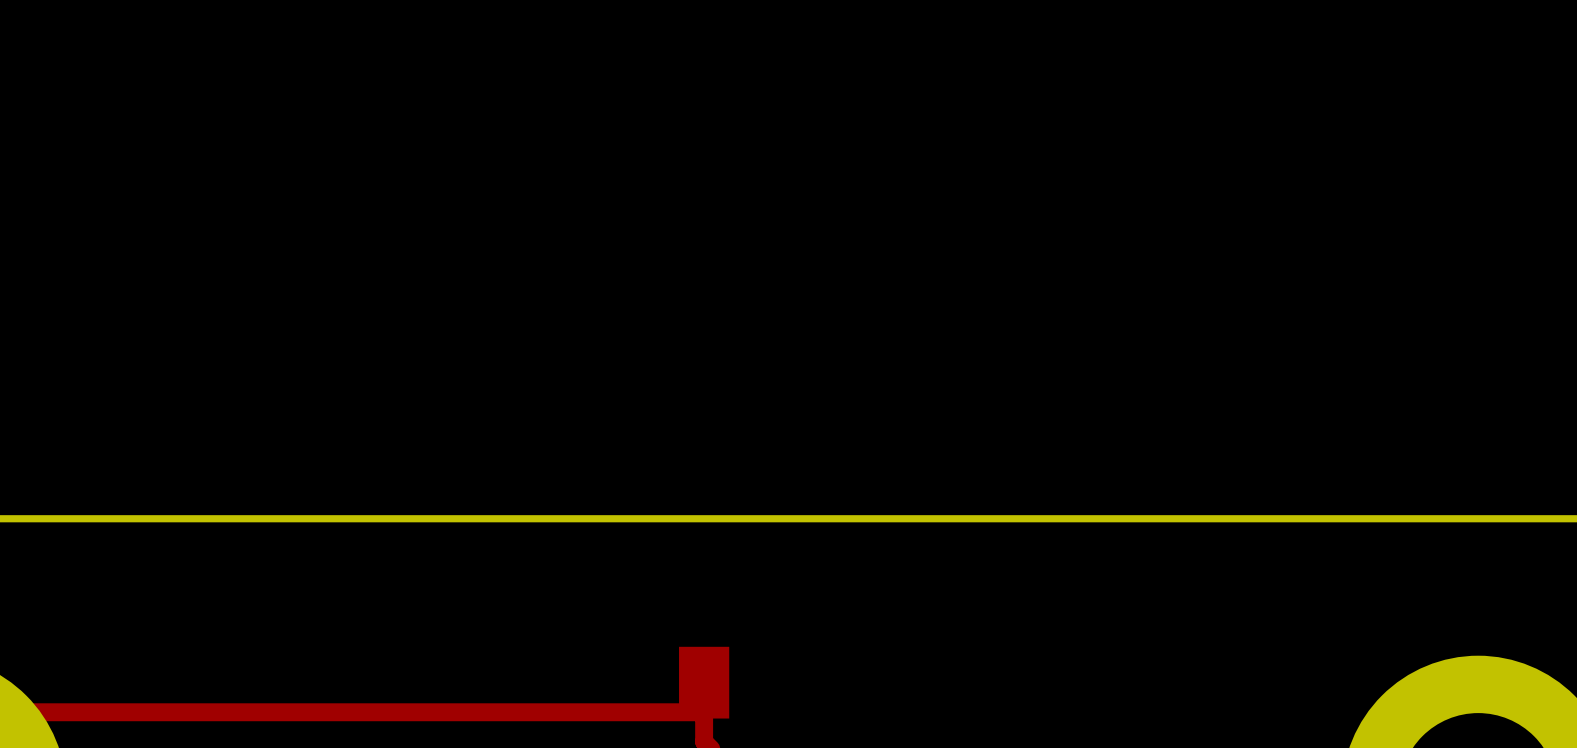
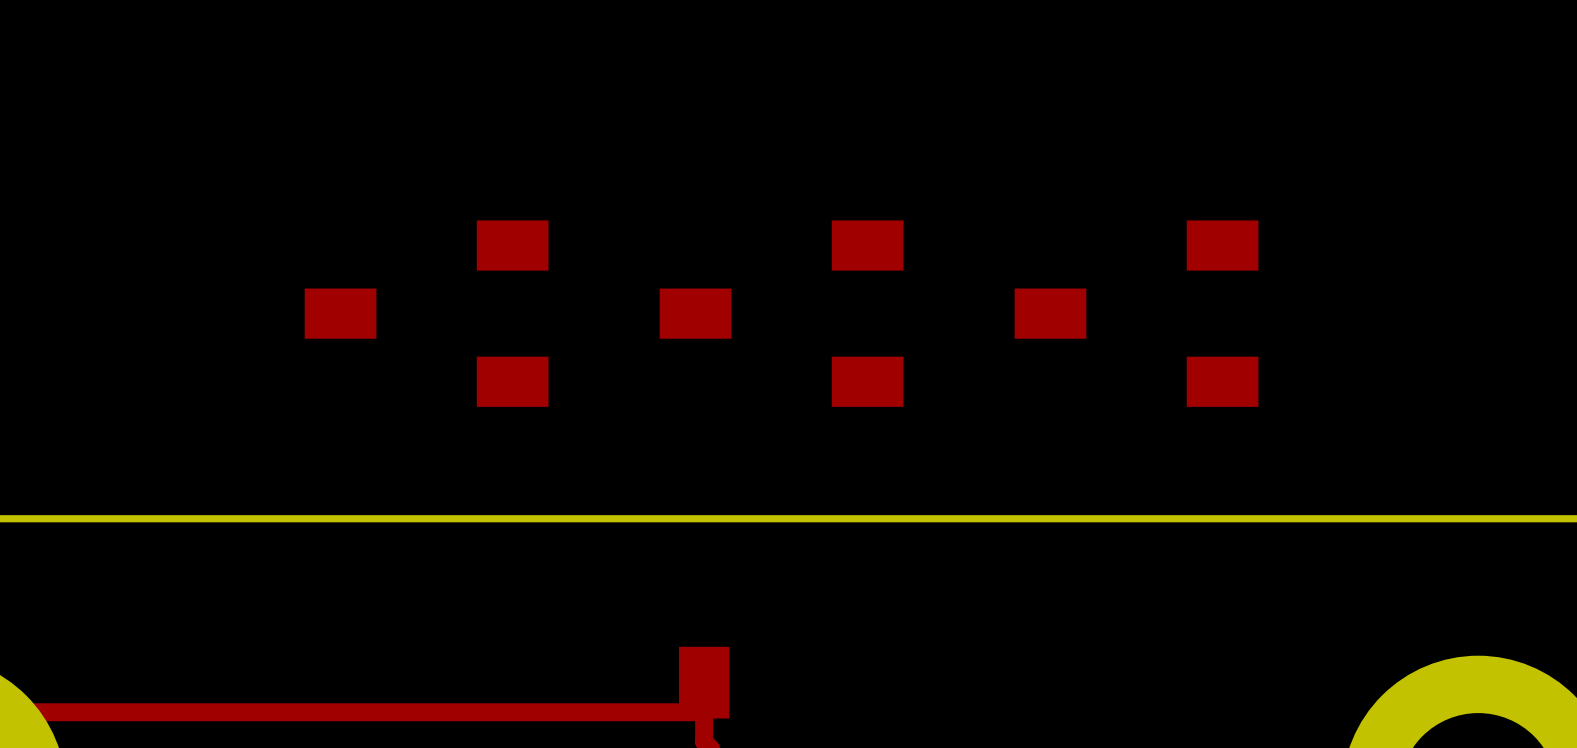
part: none -> (426, 313)
part: none -> (781, 313)
part: none -> (1136, 313)

